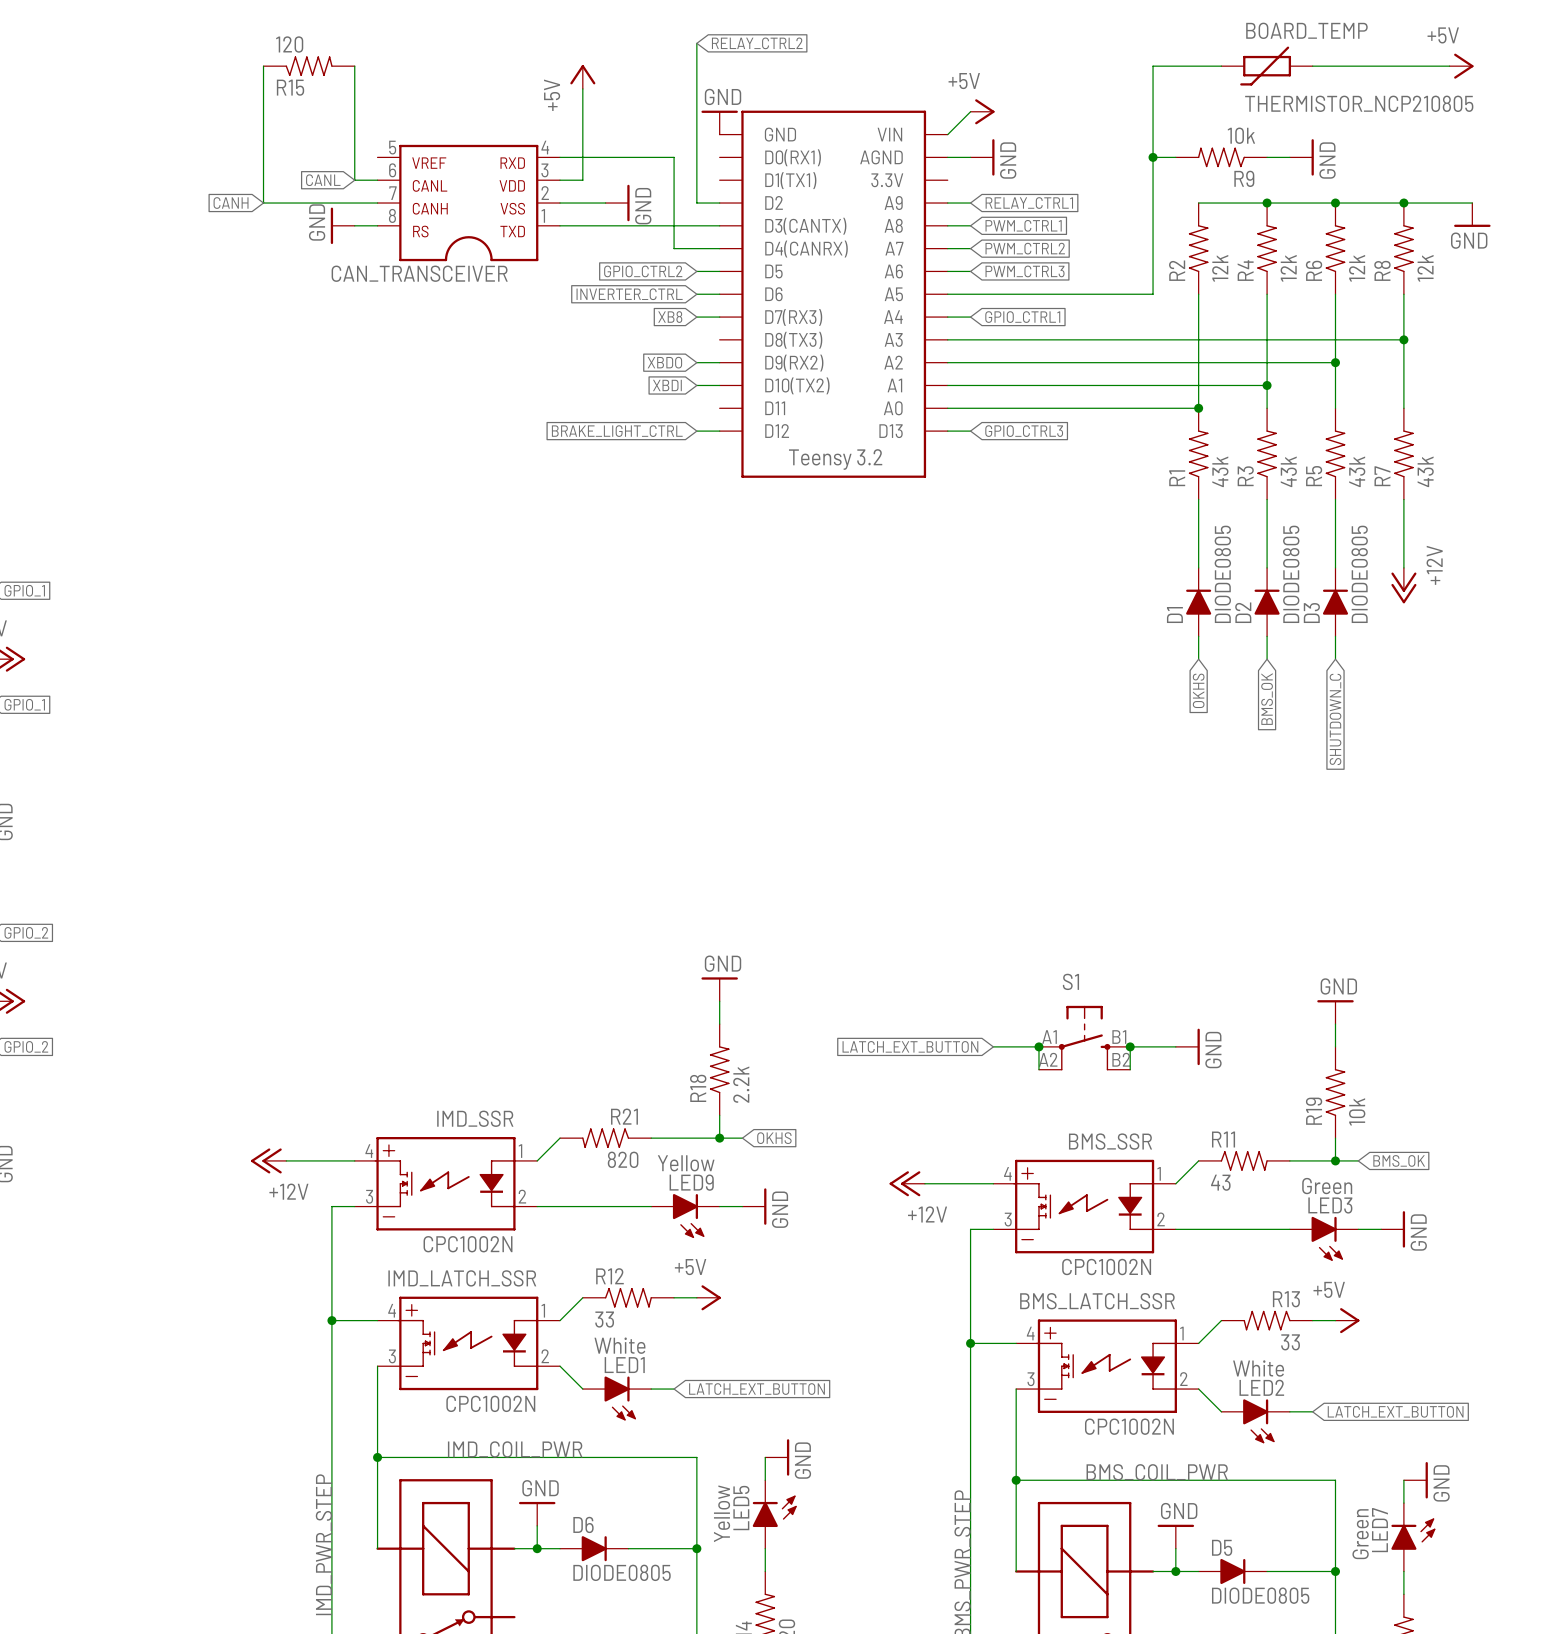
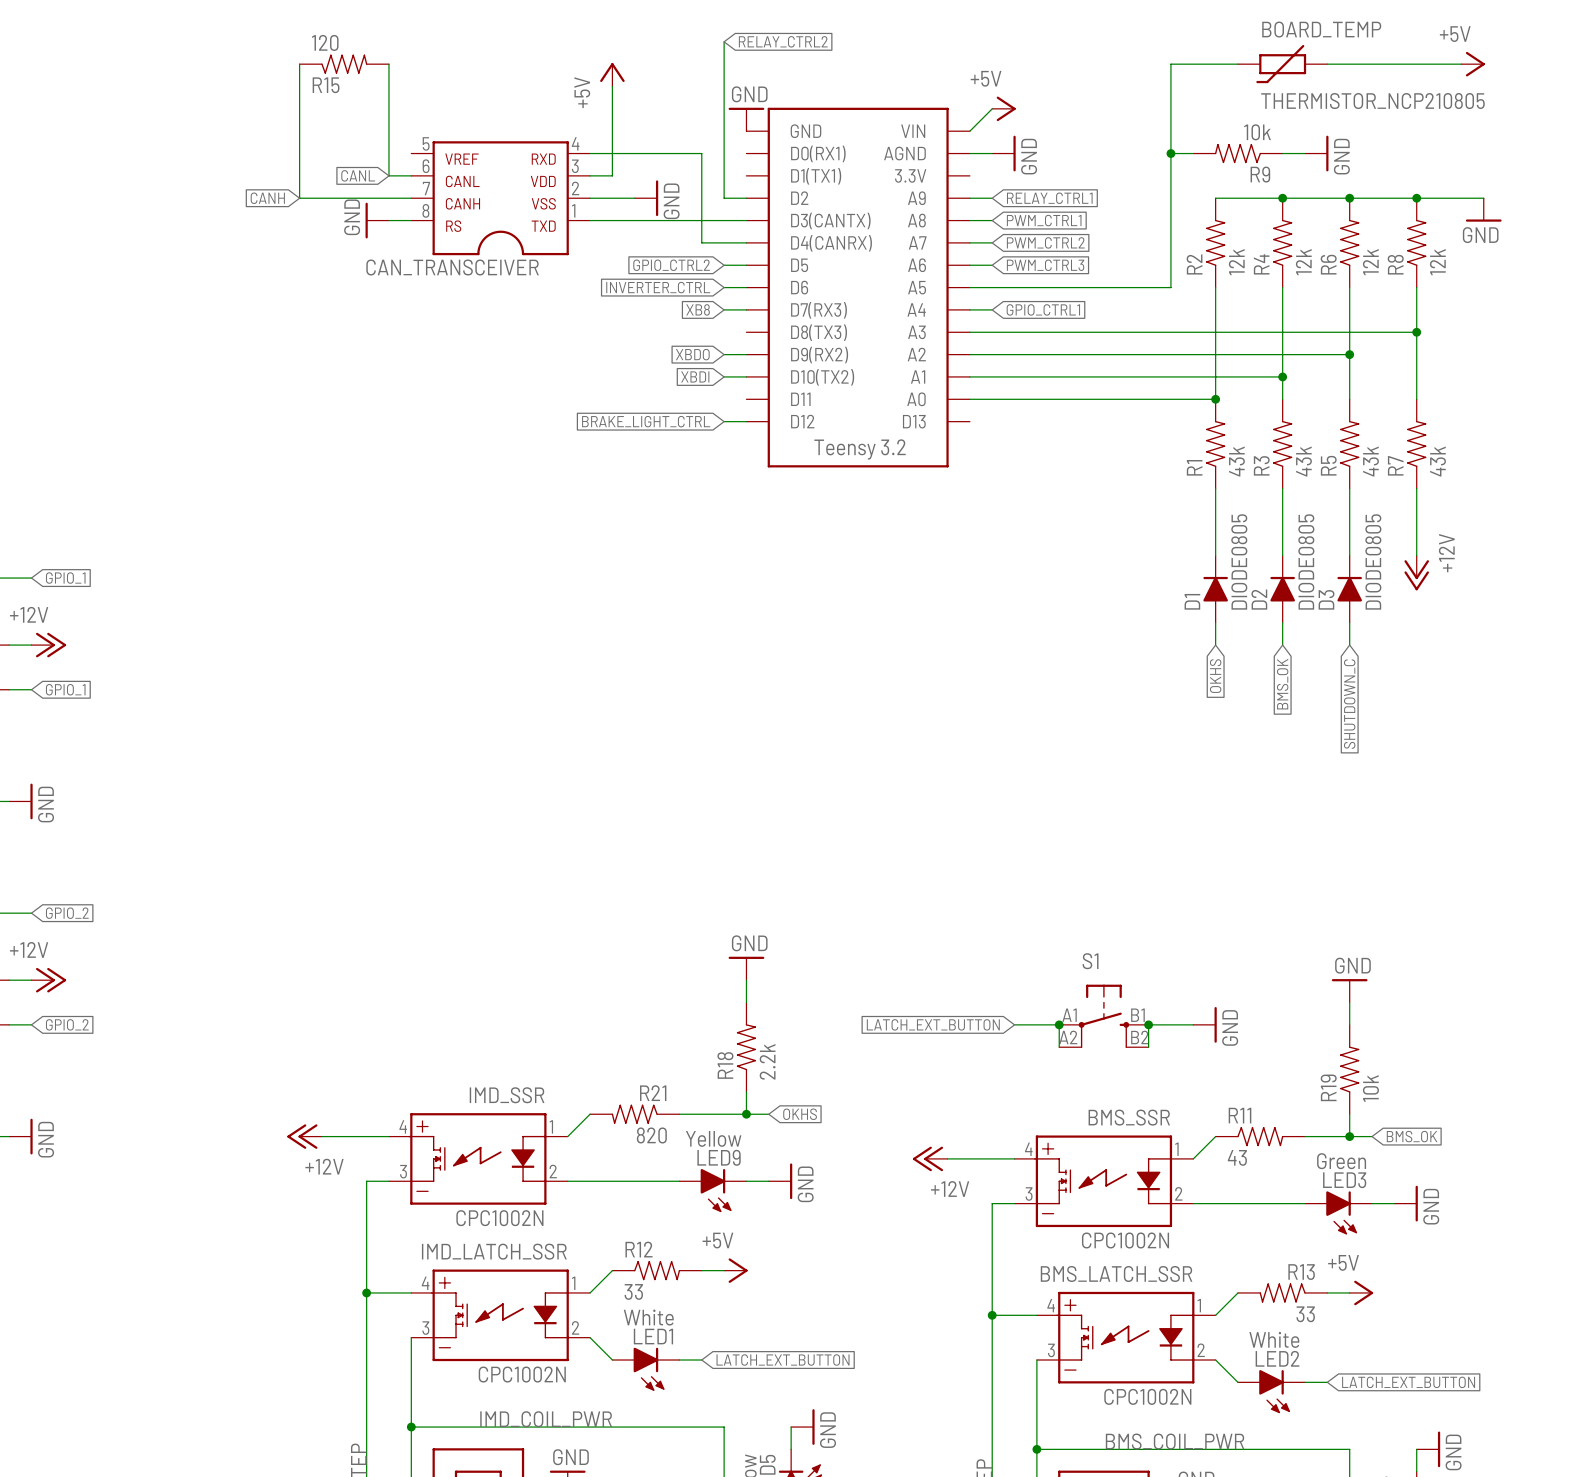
wire: (947, 431) (970, 431) -> none
global label: GPIO_CTRL3 (1024, 431) -> none

